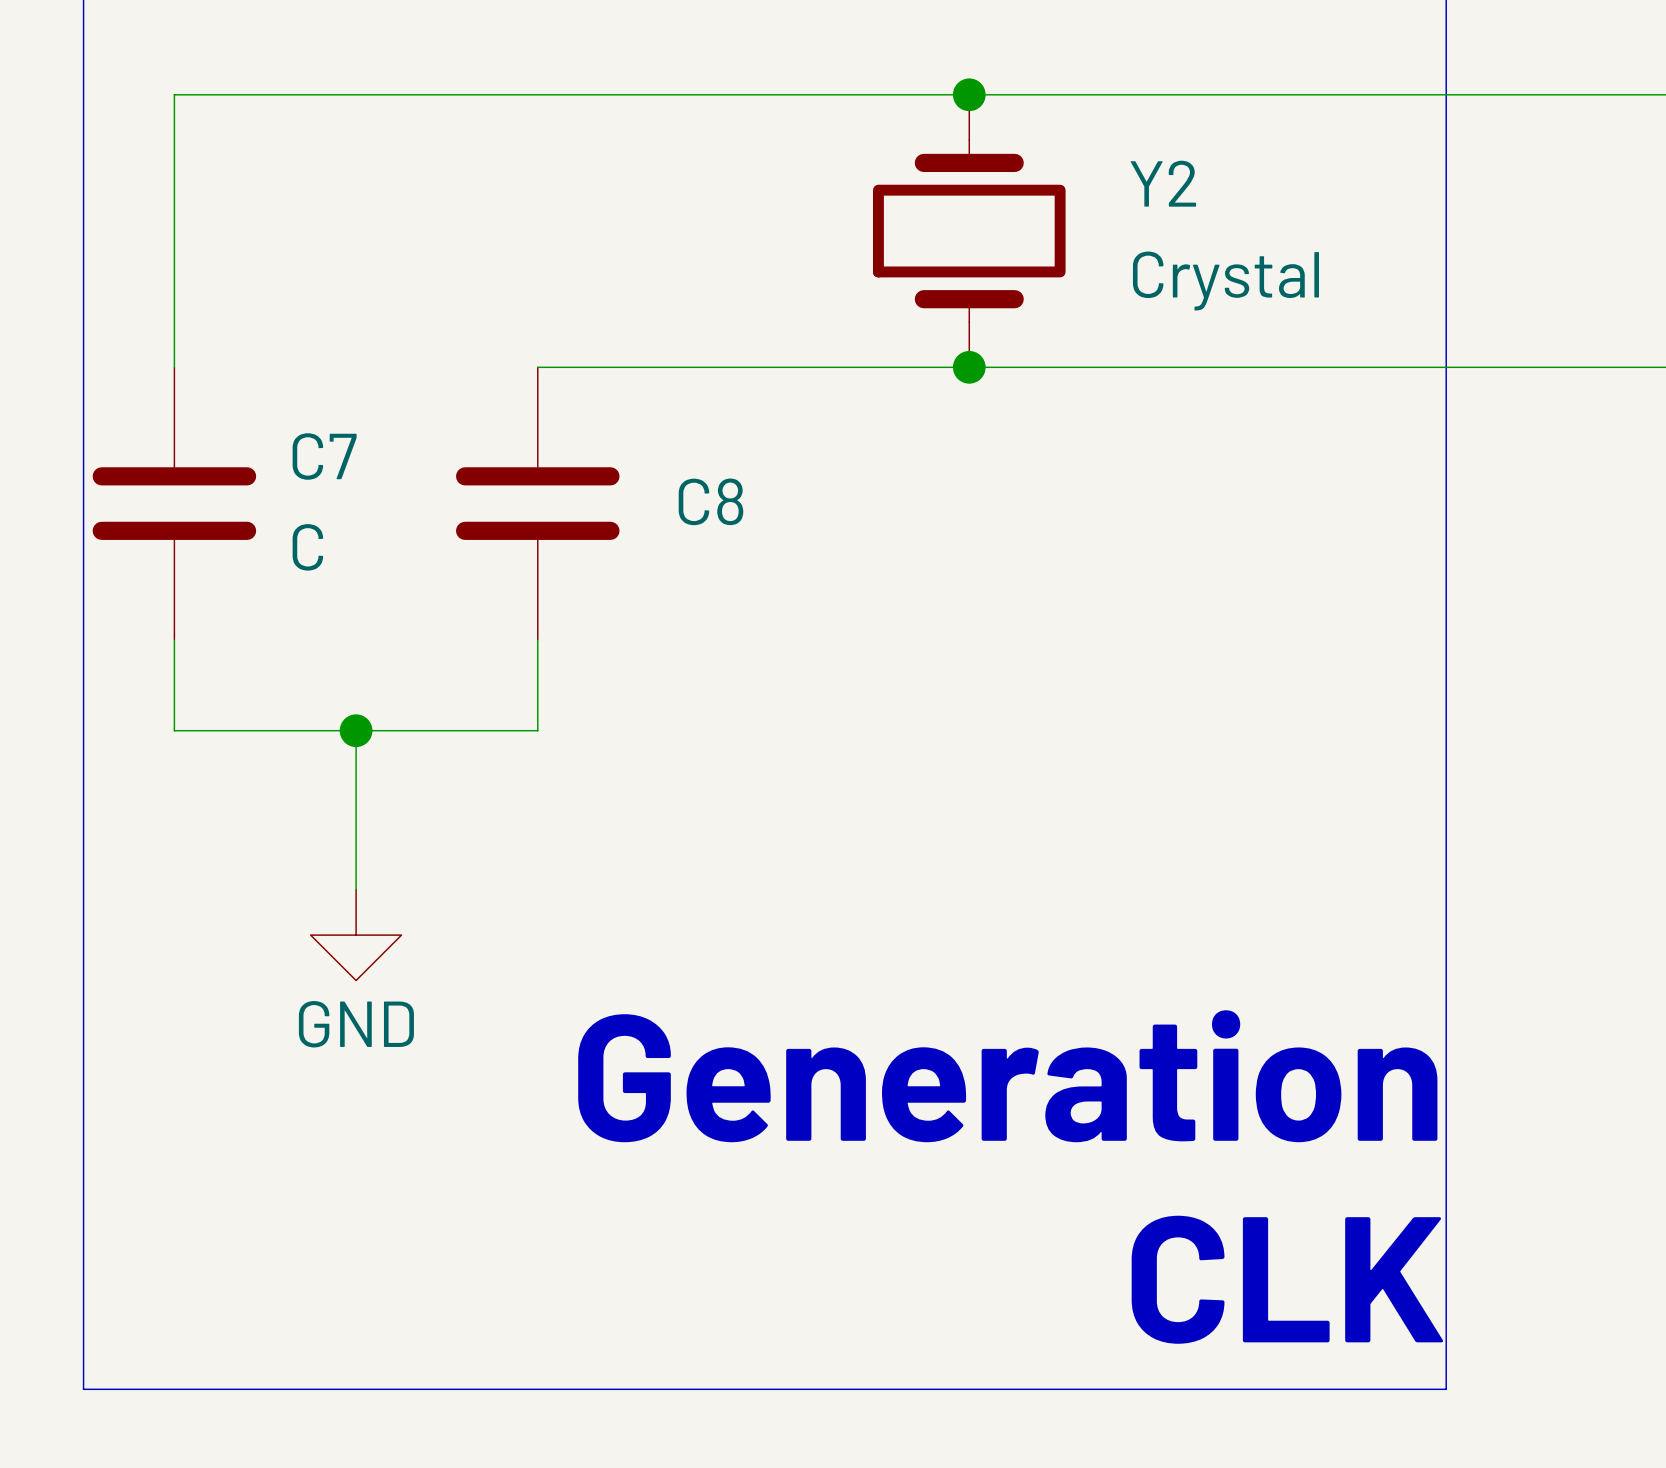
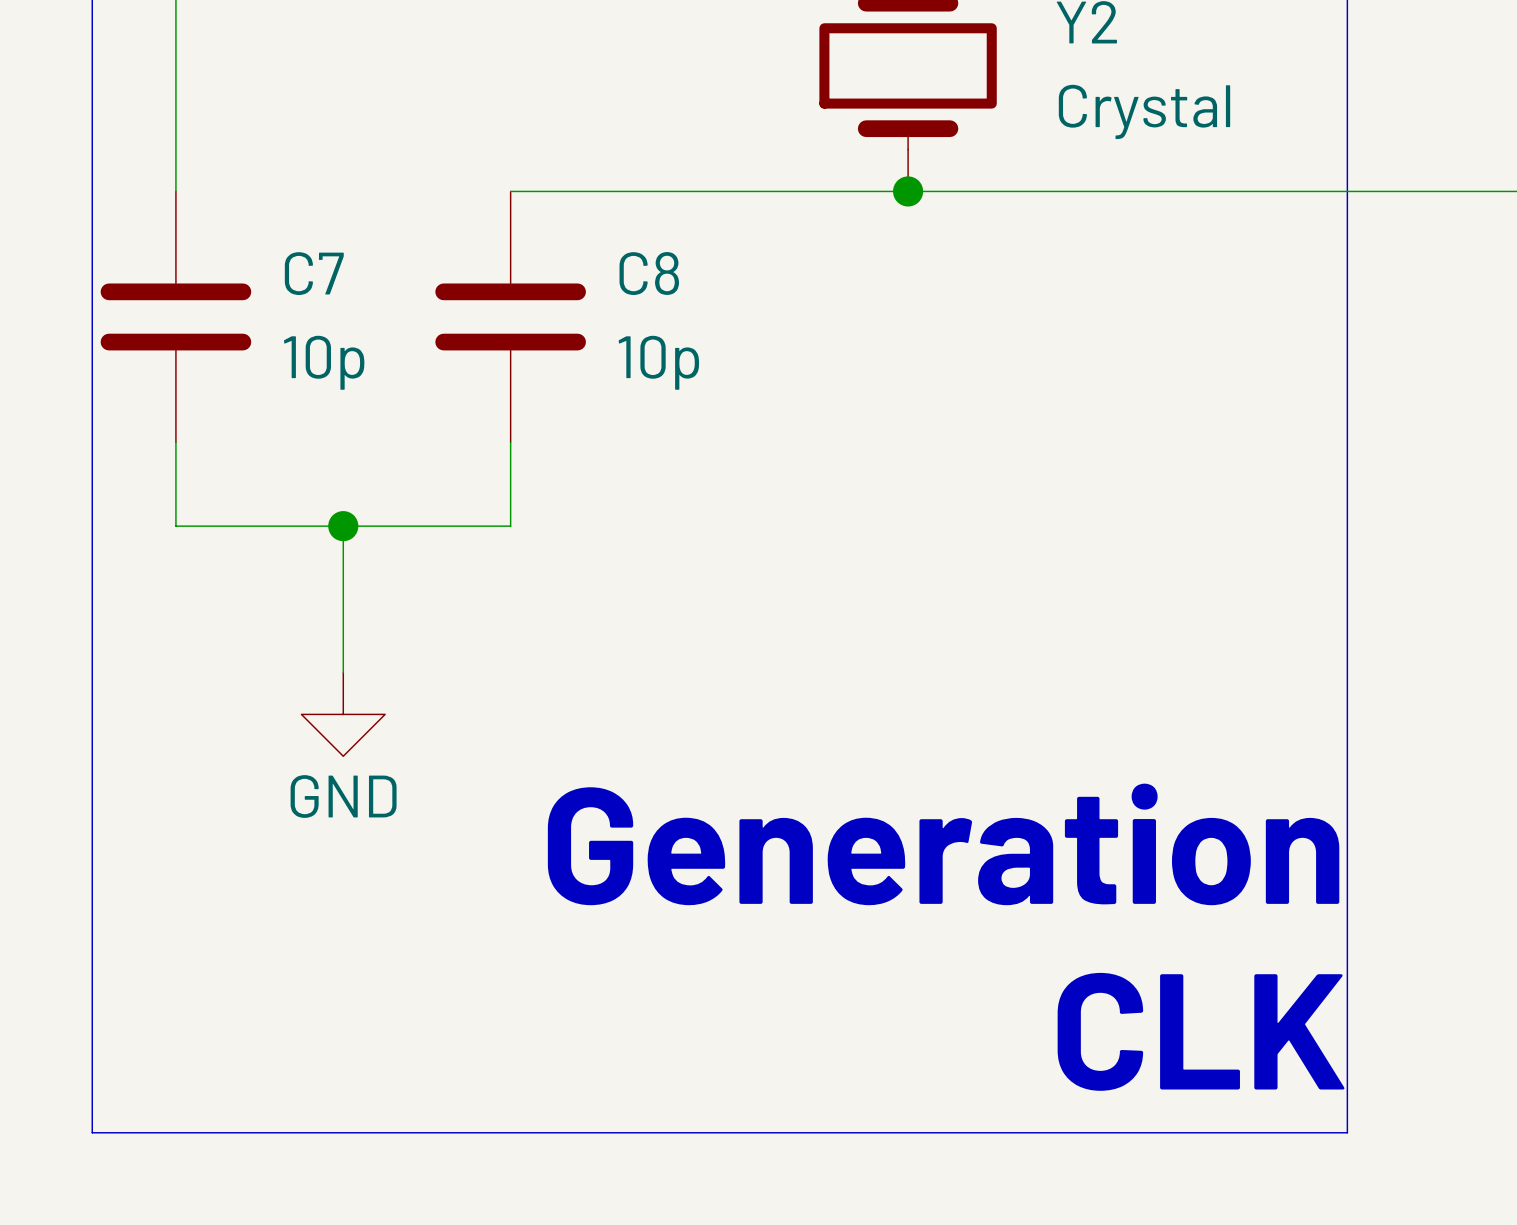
C8 name position: C8 (710, 501) -> C8 (649, 273)
C7 value: C (307, 547) -> 10p (324, 362)
C8 value: none -> 10p (658, 362)

